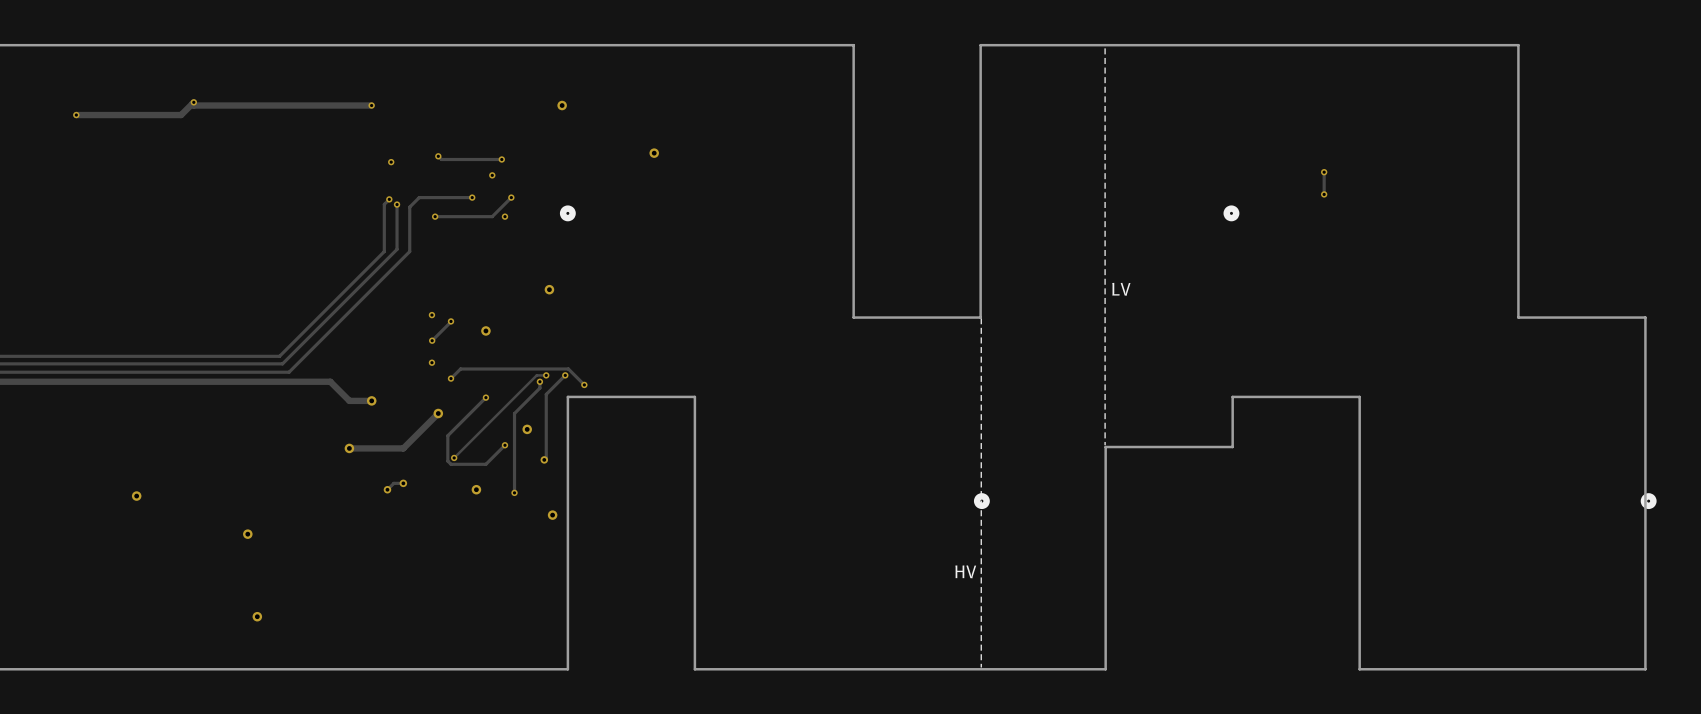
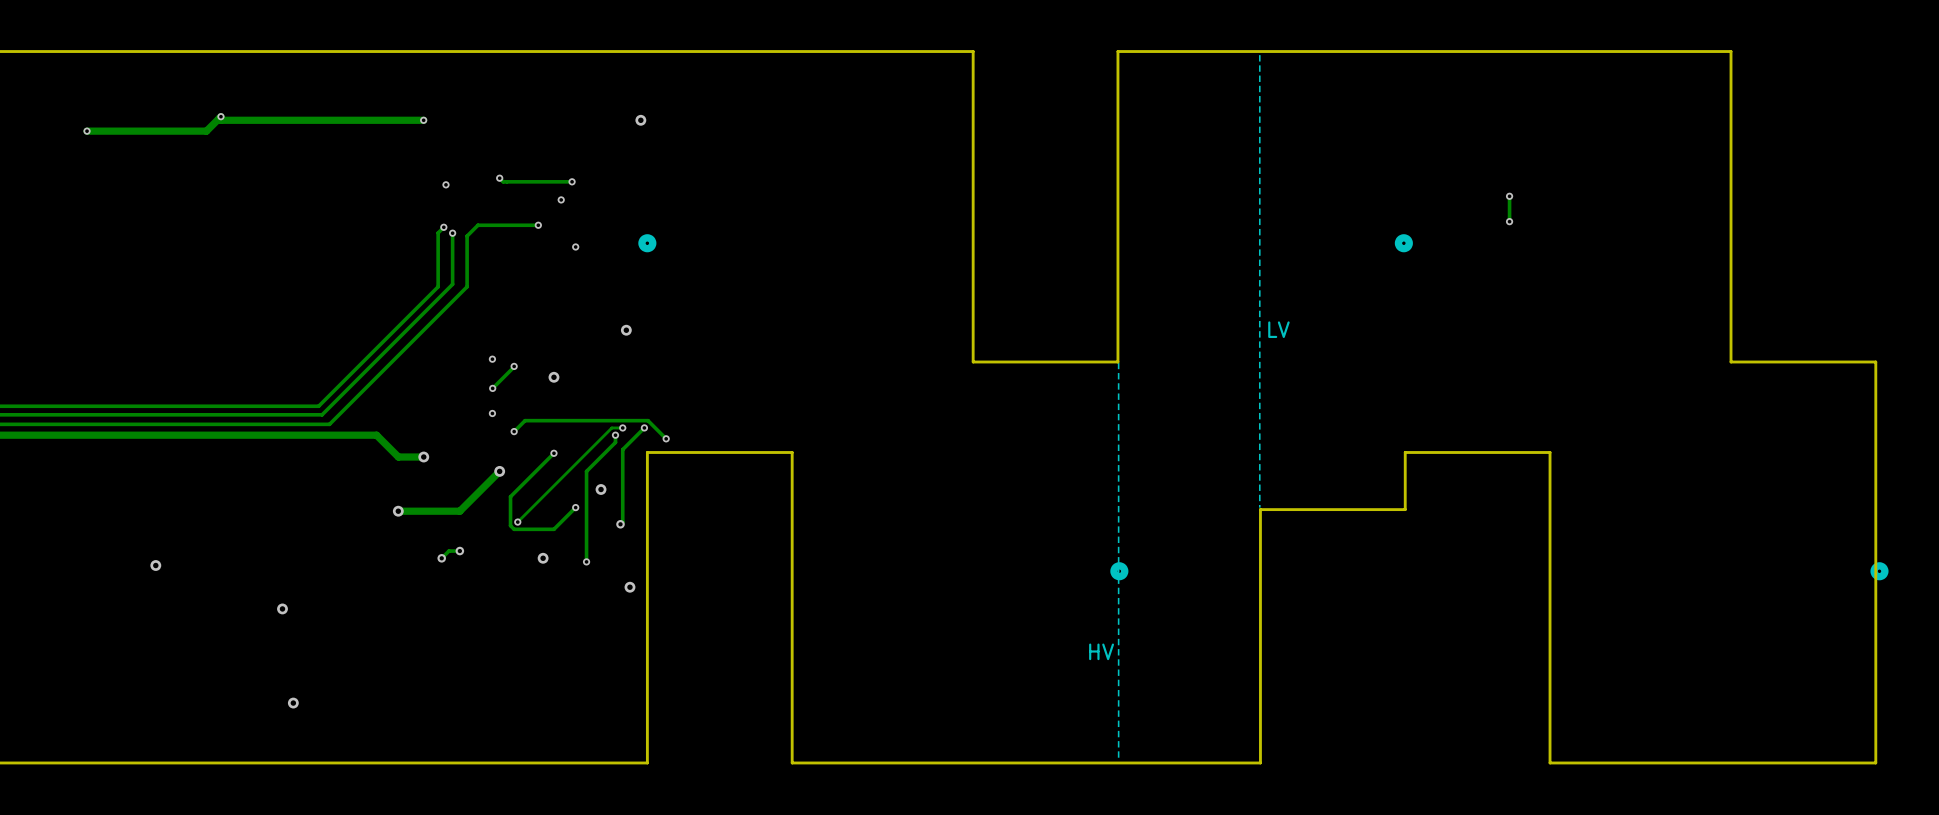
via: (654, 153) -> none
track: (511, 197) (492, 216) (435, 216) -> none
via: (511, 197) -> none
via: (435, 216) -> none

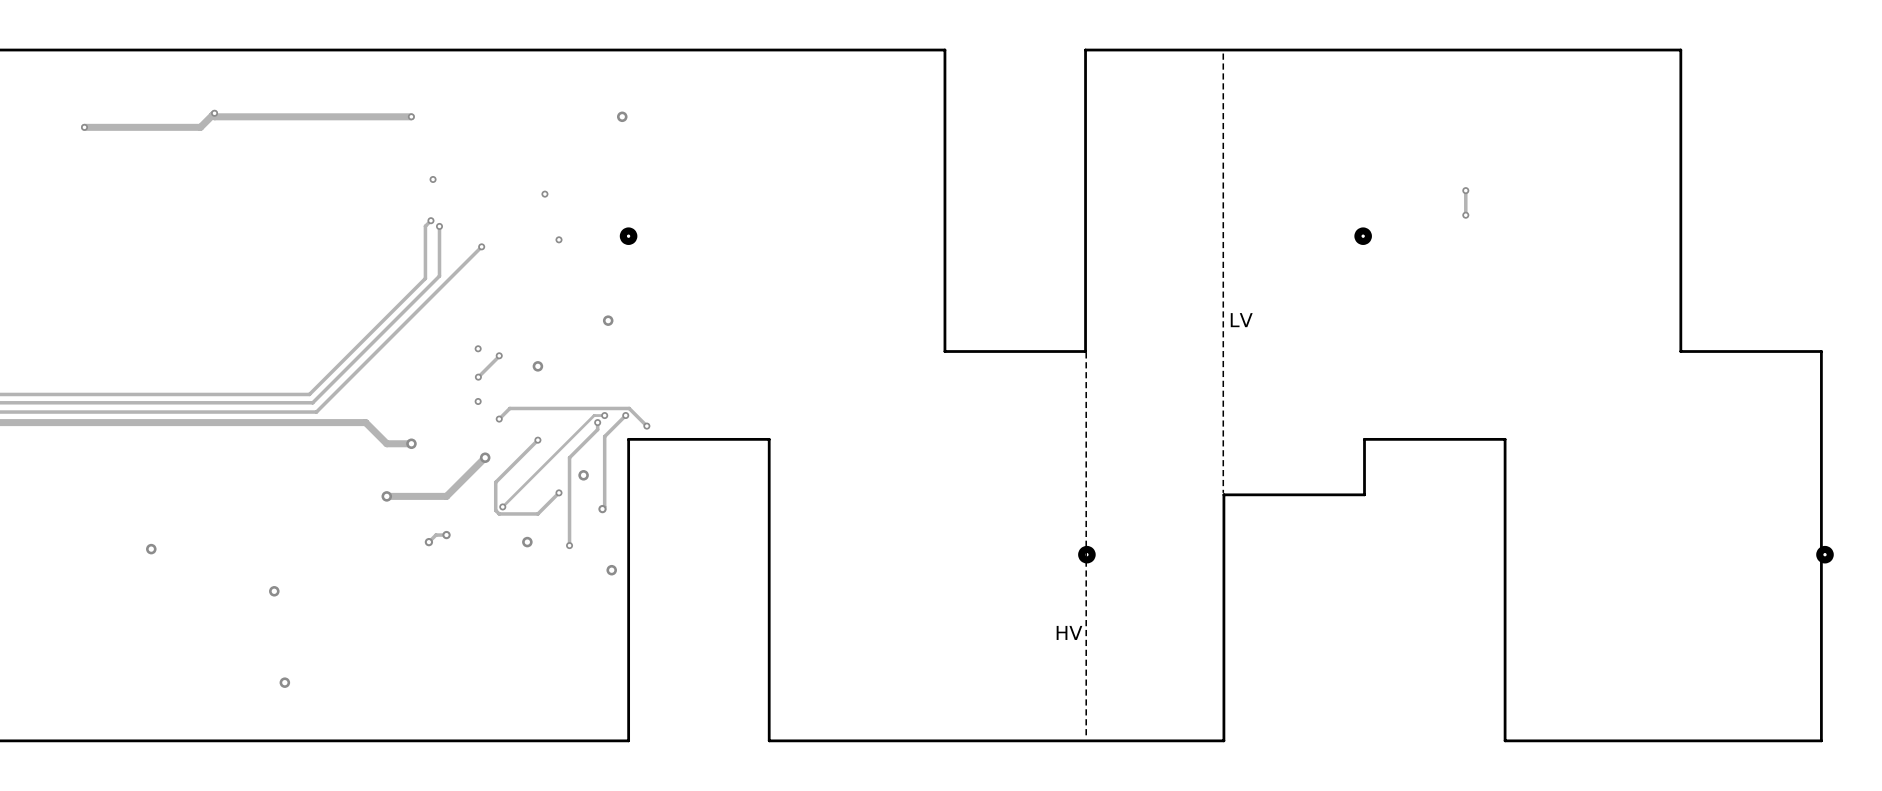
track: (499, 178) (503, 181) (572, 181) -> none
via: (499, 178) -> none
via: (572, 181) -> none
track: (538, 225) (477, 225) (467, 236) (467, 286) (329, 424) (325, 424) -> (481, 246) (316, 412)
via: (538, 225) -> none
via: none -> (481, 246)

